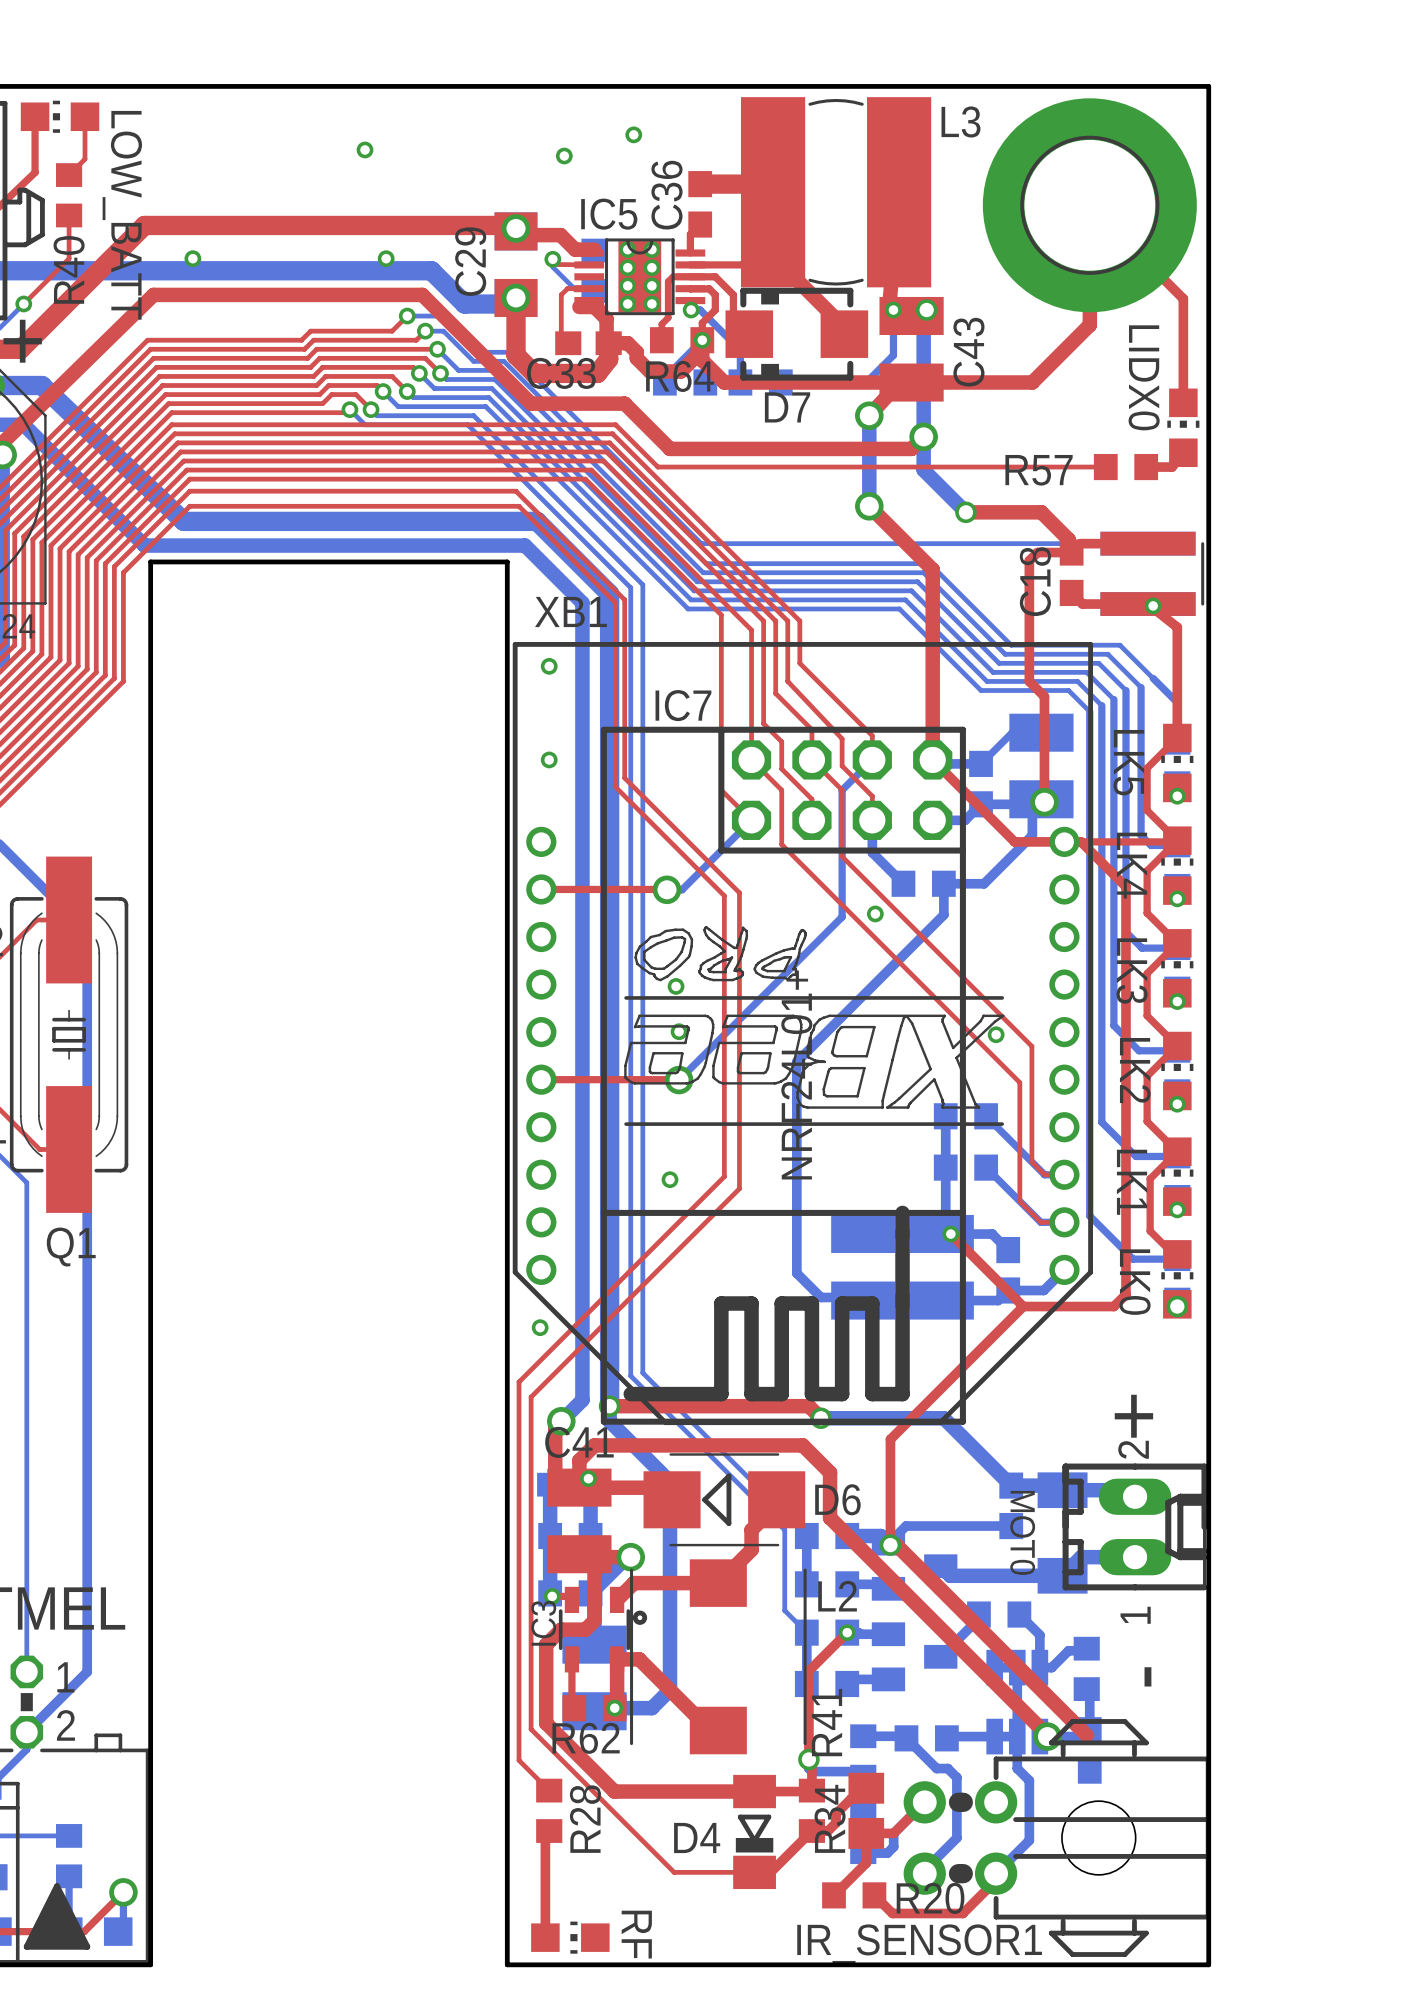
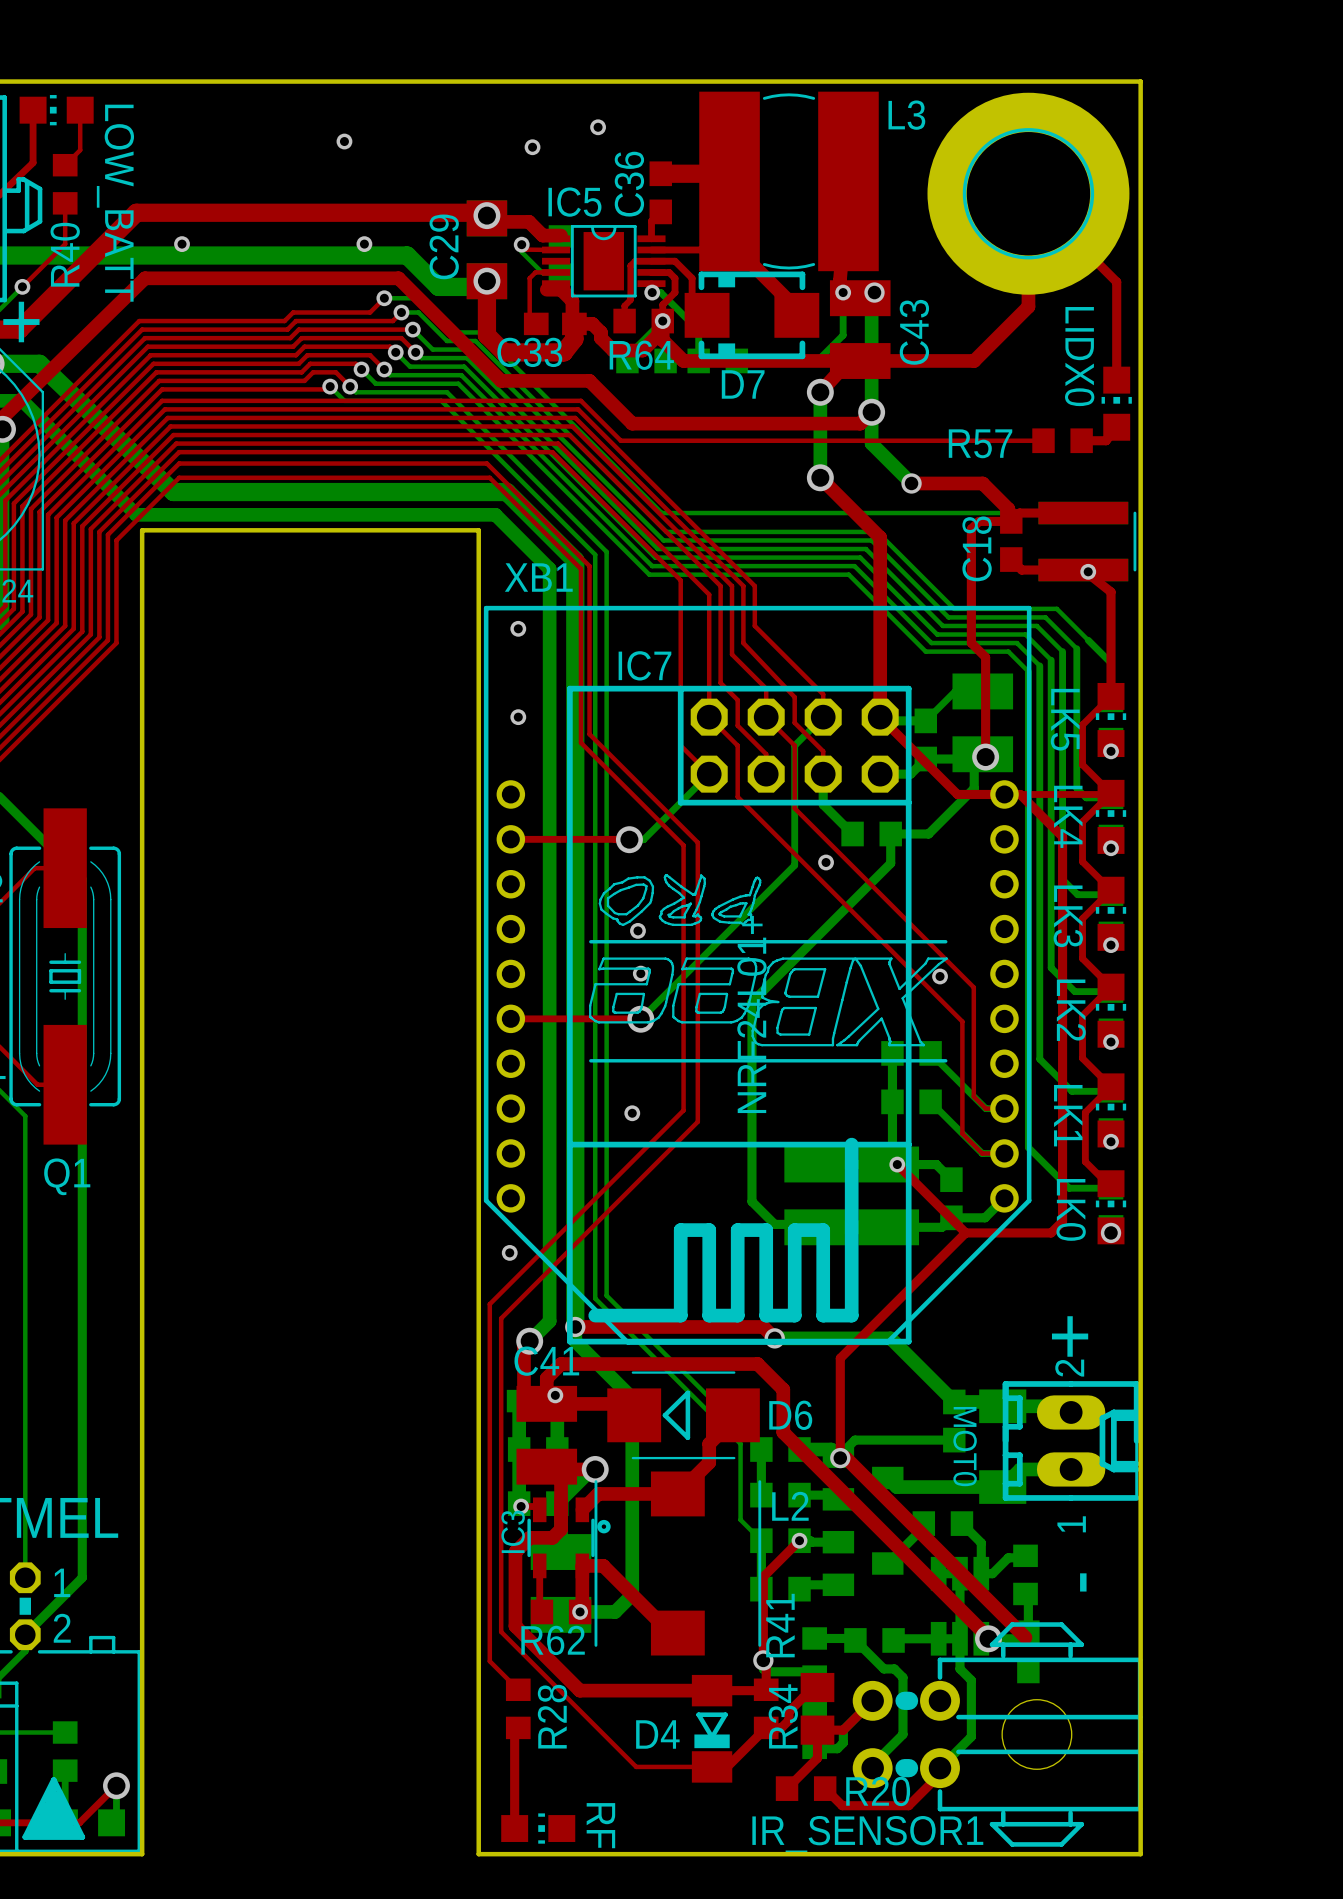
IC5 footprint: [574, 238, 706, 316] -> [542, 225, 666, 298]
via: (627, 249) -> none
via: (651, 249) -> none
via: (627, 267) -> none
via: (651, 267) -> none
via: (627, 285) -> none
via: (651, 285) -> none
via: (627, 303) -> none
via: (651, 303) -> none

